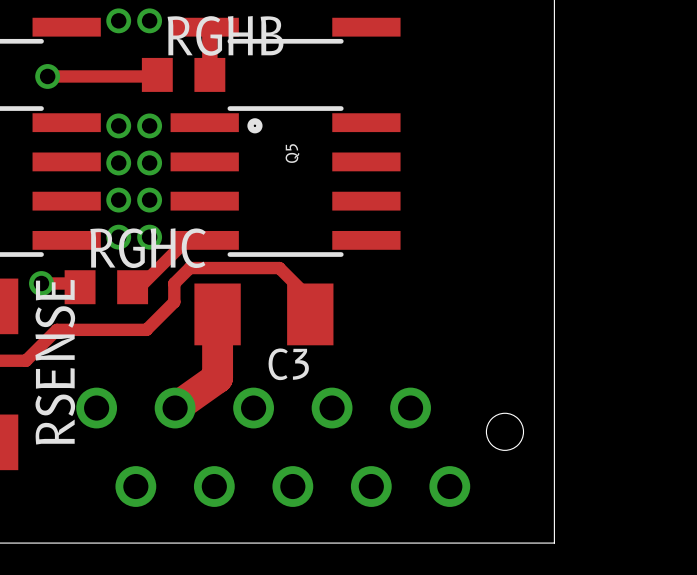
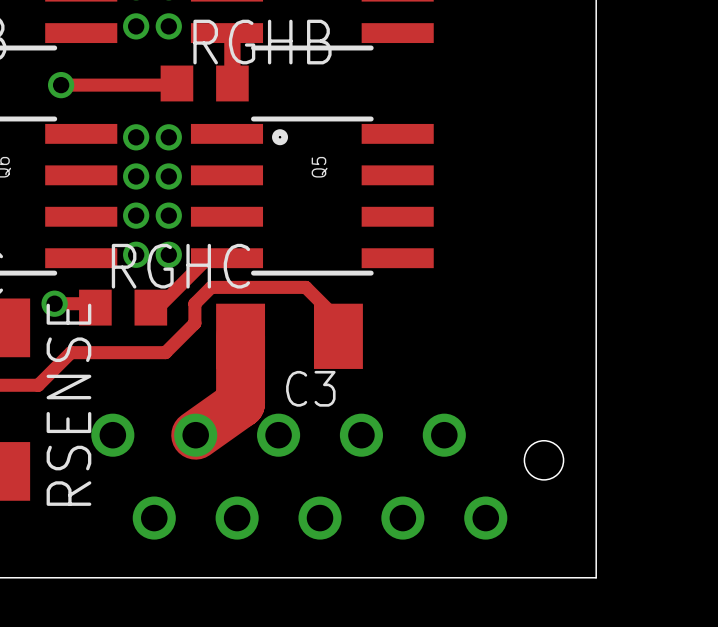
track width: thin (217, 314) (217, 377) (175, 408) -> thick (240, 336) (240, 403) (195, 435)

